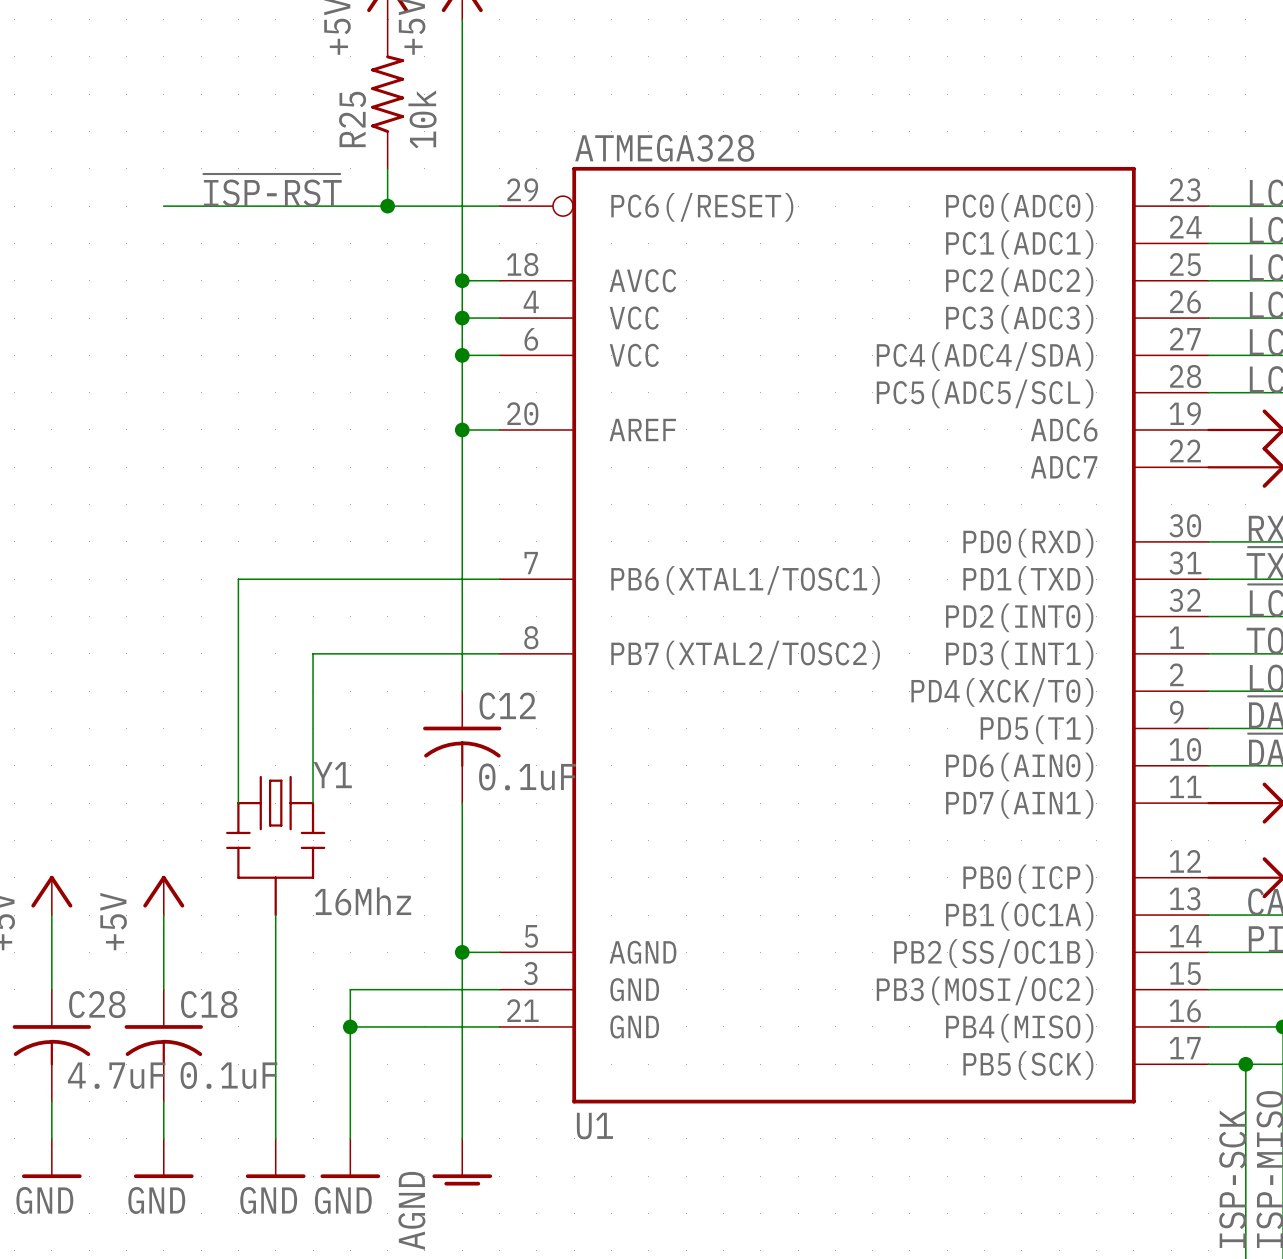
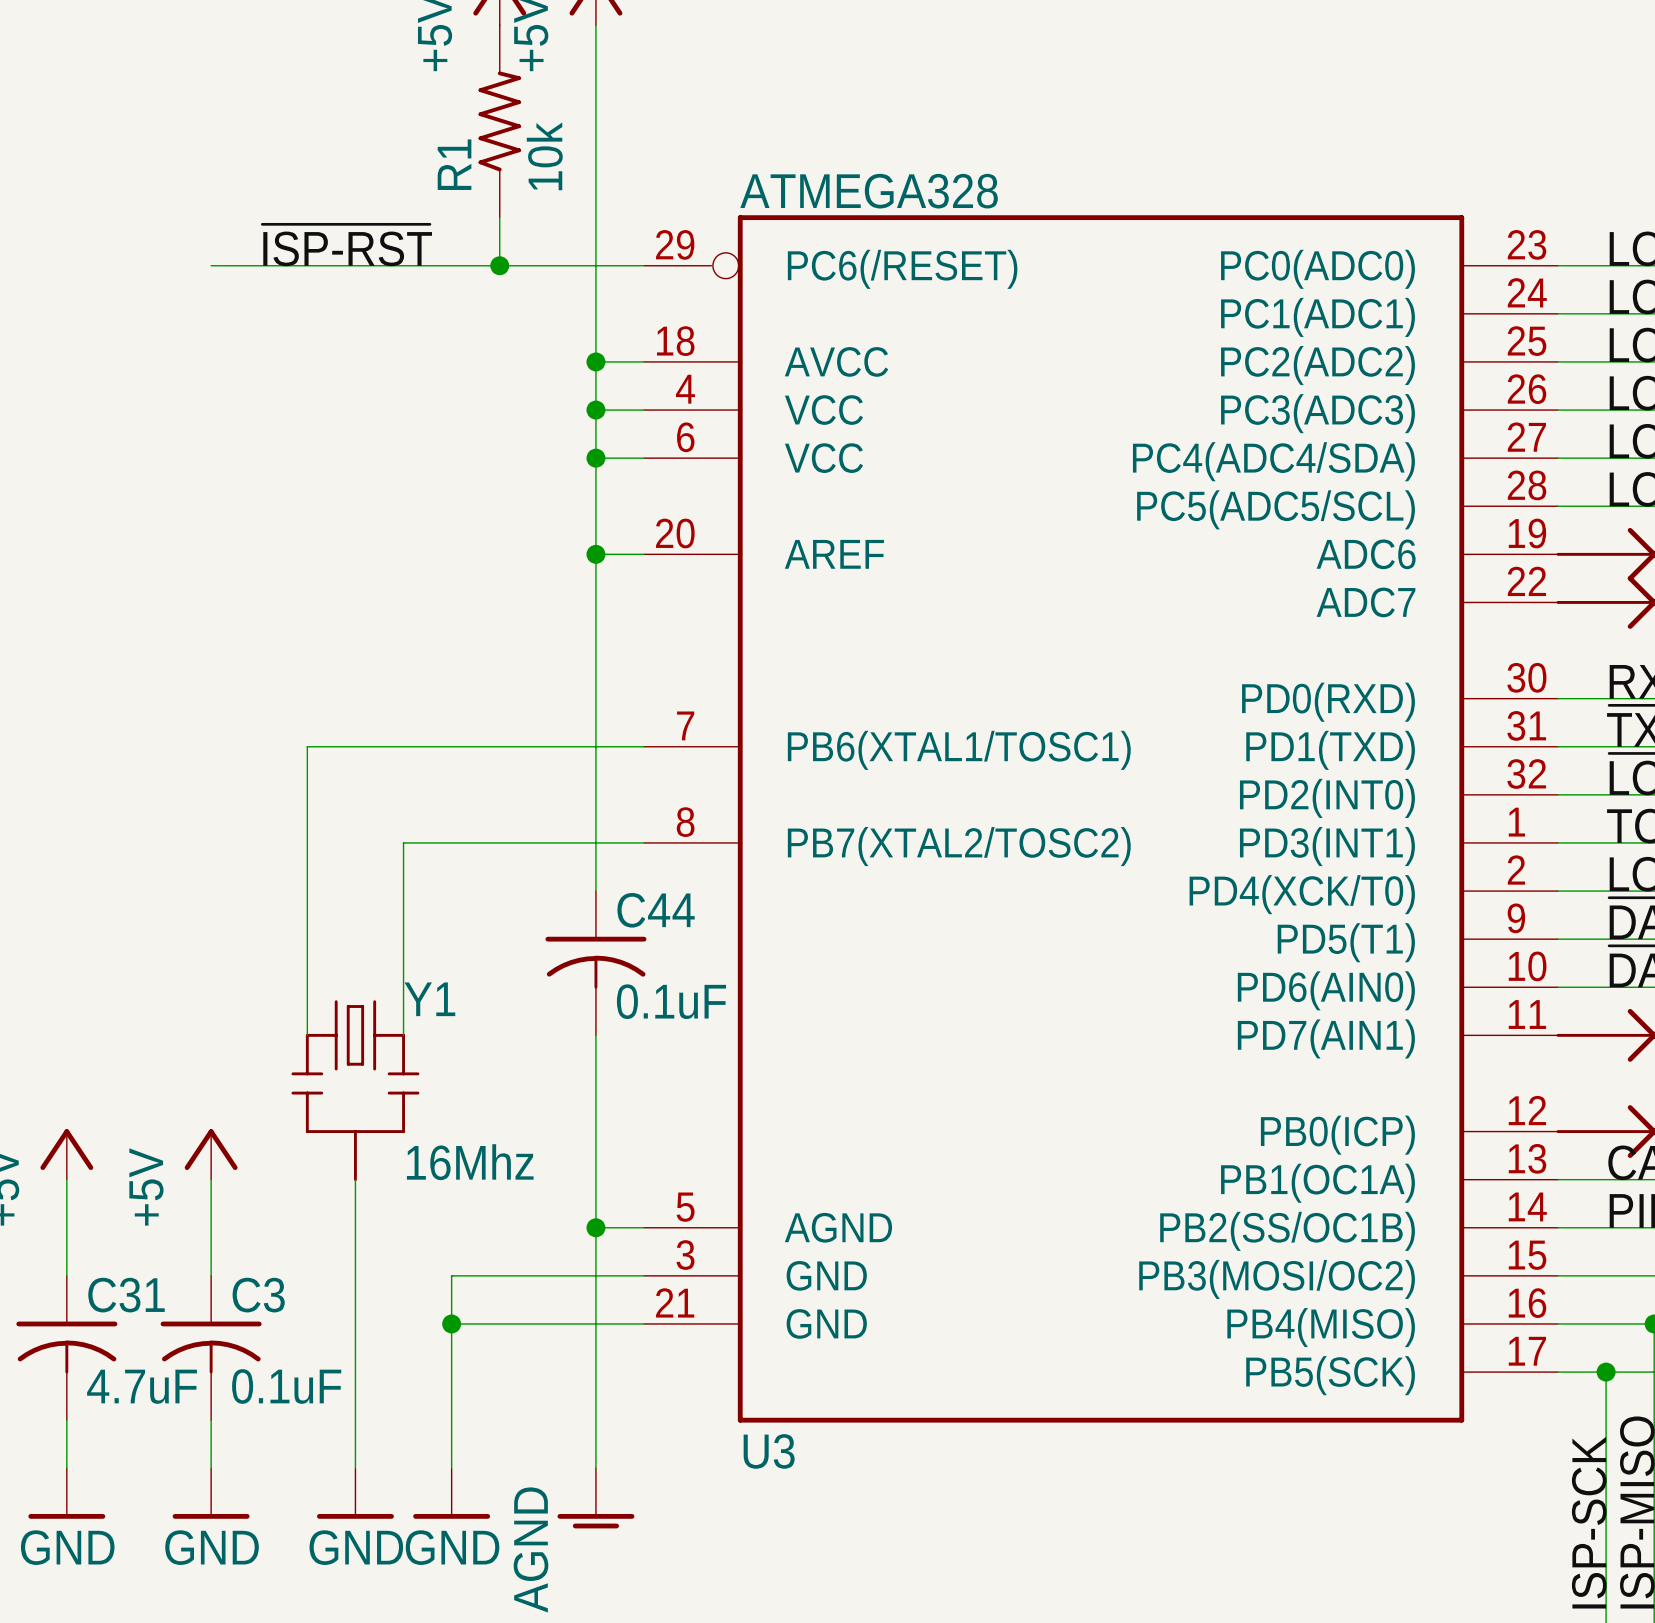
R25 name: R25 (352, 119) -> R1 (454, 164)
C12 name: C12 (507, 706) -> C44 (656, 910)
C28 name: C28 (97, 1004) -> C31 (126, 1295)
C18 name: C18 (209, 1004) -> C3 (258, 1295)
U1 name: U1 (594, 1126) -> U3 (769, 1451)

